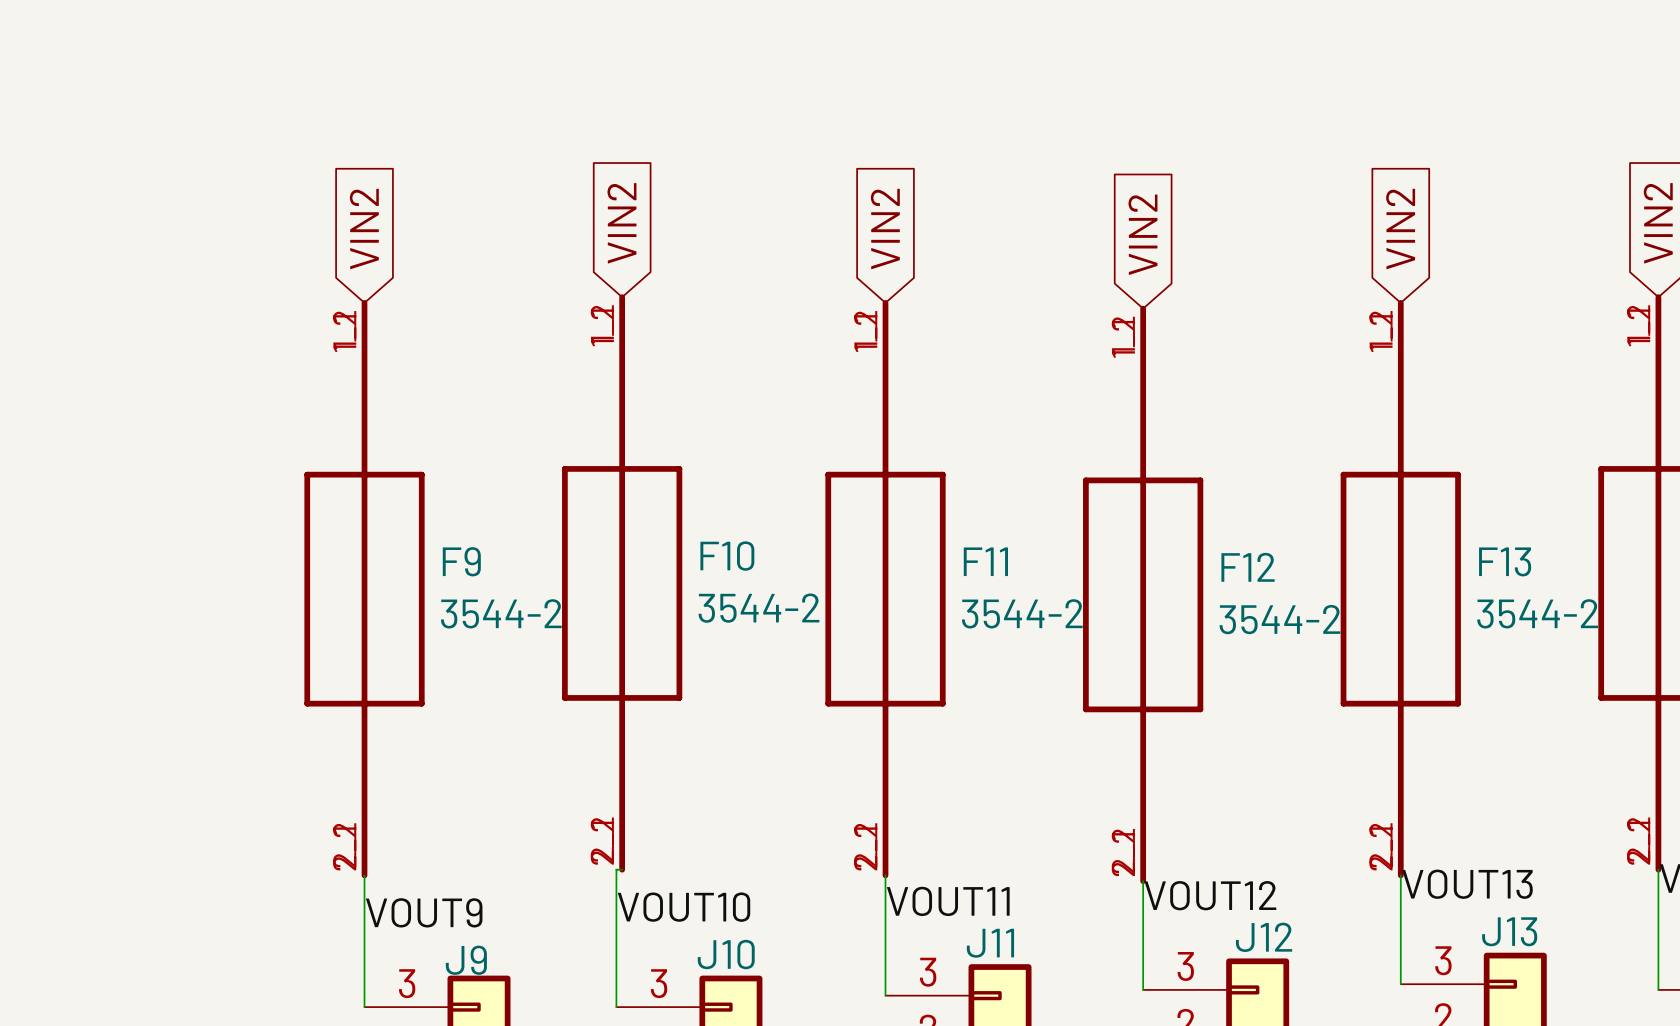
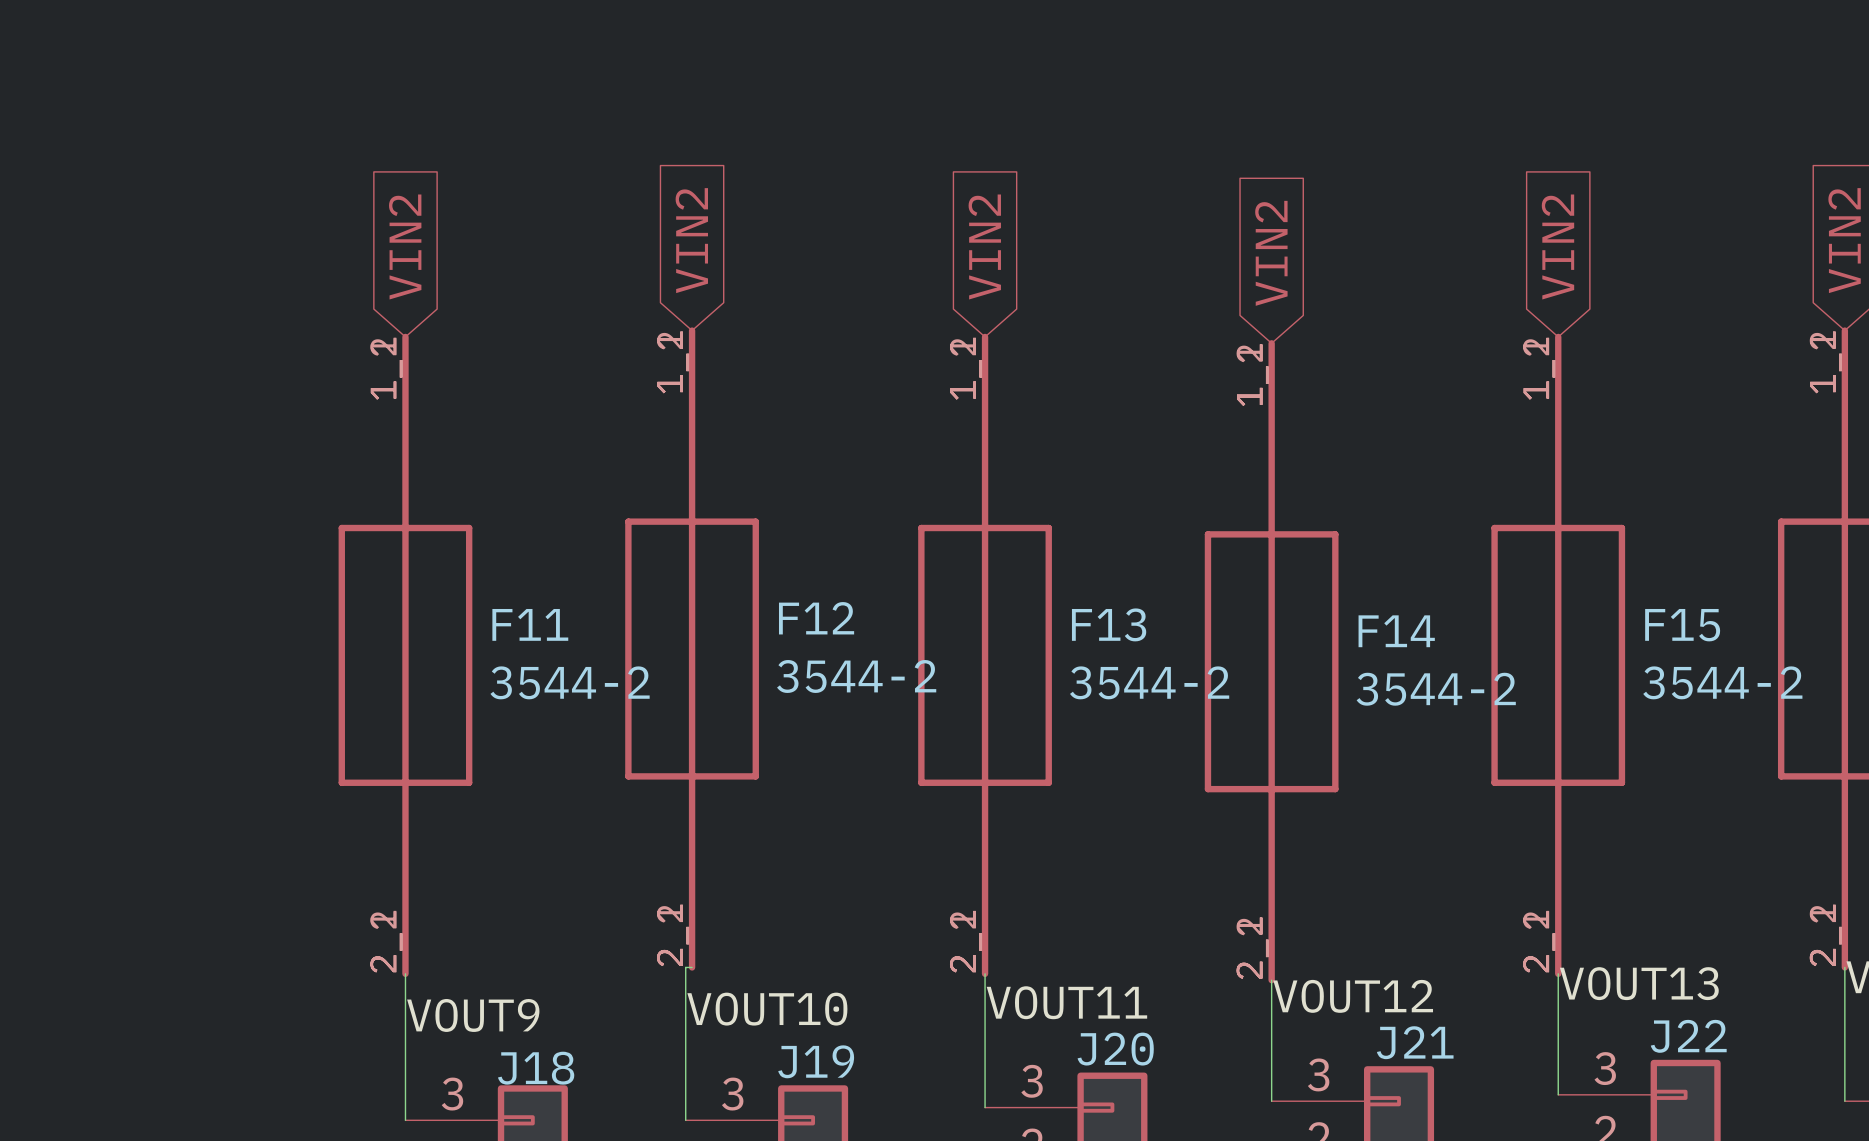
F10 name: F10 (727, 556) -> F12 (816, 618)
F9 name: F9 (461, 561) -> F11 (530, 624)
F11 name: F11 (985, 561) -> F13 (1109, 624)
F13 name: F13 (1505, 561) -> F15 (1682, 625)
F12 name: F12 (1248, 567) -> F14 (1396, 631)
J13 name: J13 (1509, 931) -> J22 (1688, 1036)
J12 name: J12 (1264, 937) -> J21 (1415, 1042)
J11 name: J11 (990, 943) -> J20 (1115, 1049)
J10 name: J10 (726, 954) -> J19 (816, 1061)
J9 name: J9 (466, 960) -> J18 (536, 1068)

